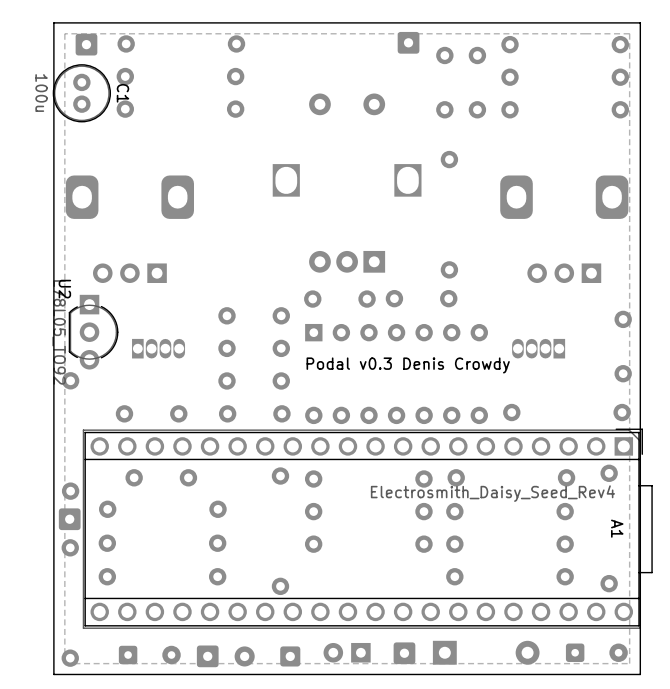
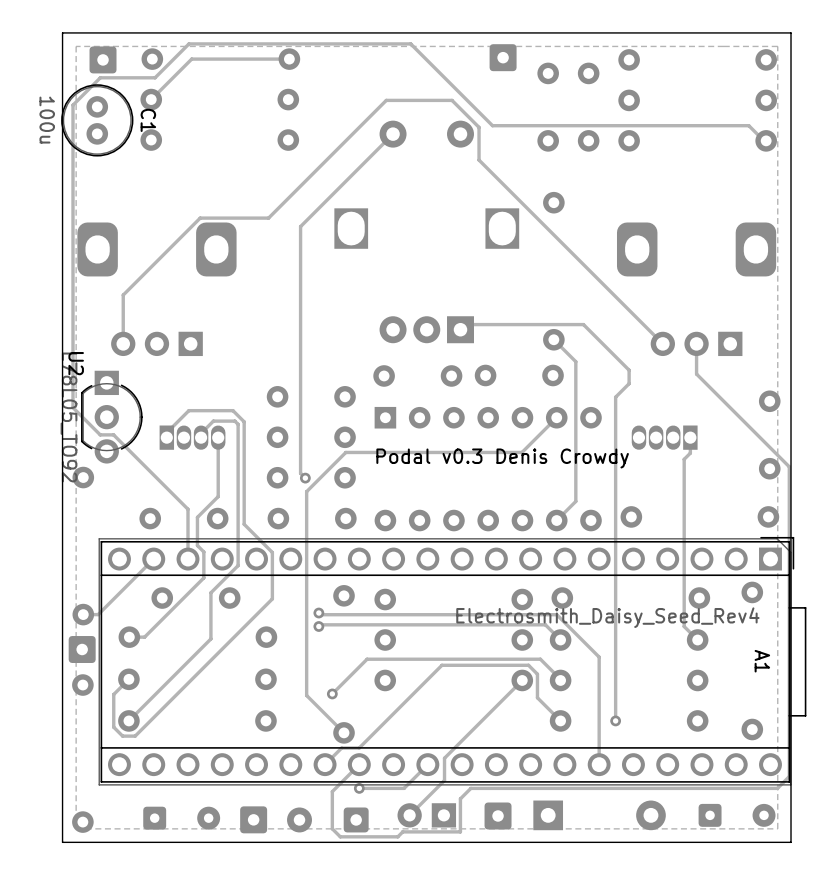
track: none -> (289, 59) (191, 59) (151, 99)
track: none -> (393, 134) (300, 226) (300, 473) (305, 478)
track: none -> (766, 140) (748, 125) (492, 125) (410, 43) (188, 43) (155, 77) (100, 77) (73, 105) (73, 407) (100, 434) (113, 434) (188, 509) (188, 559)
track: none -> (469, 338) (460, 329) (465, 324) (583, 324) (629, 370) (629, 383) (615, 397) (615, 720)
track: none -> (553, 339) (575, 361) (575, 501) (556, 520)
track: none -> (662, 343) (479, 160) (479, 127) (452, 100) (386, 100) (268, 218) (200, 218) (123, 295) (123, 343)
track: none -> (696, 343) (696, 374) (789, 466) (789, 776) (777, 788) (470, 788) (460, 798) (460, 831) (402, 831) (397, 836) (340, 836) (332, 828) (332, 791) (359, 764)
track: none -> (556, 417) (522, 452) (345, 452) (306, 491) (306, 695) (344, 732)
track: none -> (166, 437) (166, 432) (188, 410) (233, 410) (244, 421) (244, 524) (272, 552) (272, 598) (135, 736) (122, 736) (113, 727) (113, 694) (128, 679)
track: none -> (201, 437) (201, 433) (213, 421) (234, 421) (238, 424) (238, 565) (210, 592) (210, 638) (128, 720)
track: none -> (218, 437) (218, 496) (197, 517) (197, 545) (203, 551) (203, 577) (144, 637) (129, 637)
track: none -> (690, 437) (690, 453) (684, 459) (684, 626) (697, 639)
via: none -> (305, 478)
track: none -> (153, 559) (98, 614) (83, 614)
track: none -> (318, 613) (320, 614) (556, 614) (599, 657) (599, 764)
via: none -> (318, 613)
track: none -> (318, 626) (320, 624) (545, 624) (560, 639)
via: none -> (318, 626)
track: none -> (522, 680) (444, 758) (444, 780) (409, 815)
track: none -> (560, 680) (540, 659) (367, 659) (332, 693)
via: none -> (332, 693)
track: none -> (560, 720) (537, 697) (537, 674) (528, 665) (441, 665) (359, 748) (341, 748) (325, 764)
via: none -> (615, 720)
track: none -> (427, 764) (404, 788) (359, 788)
via: none -> (359, 788)

